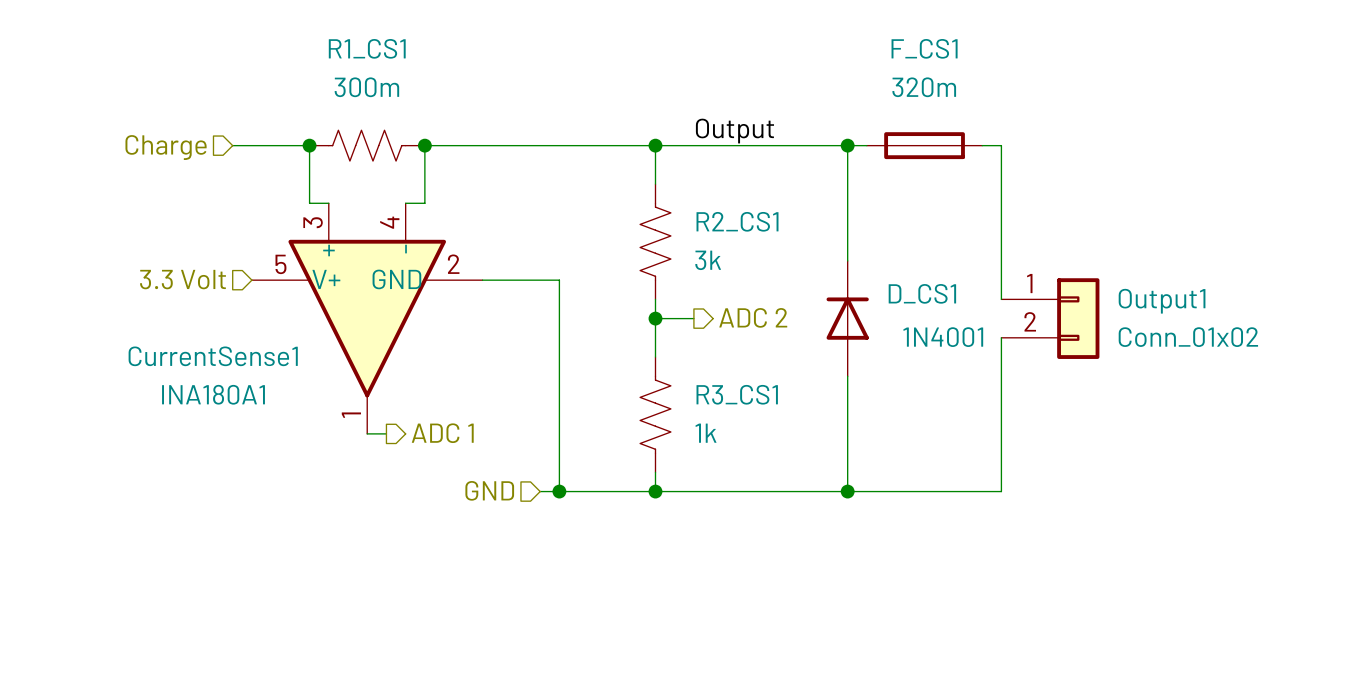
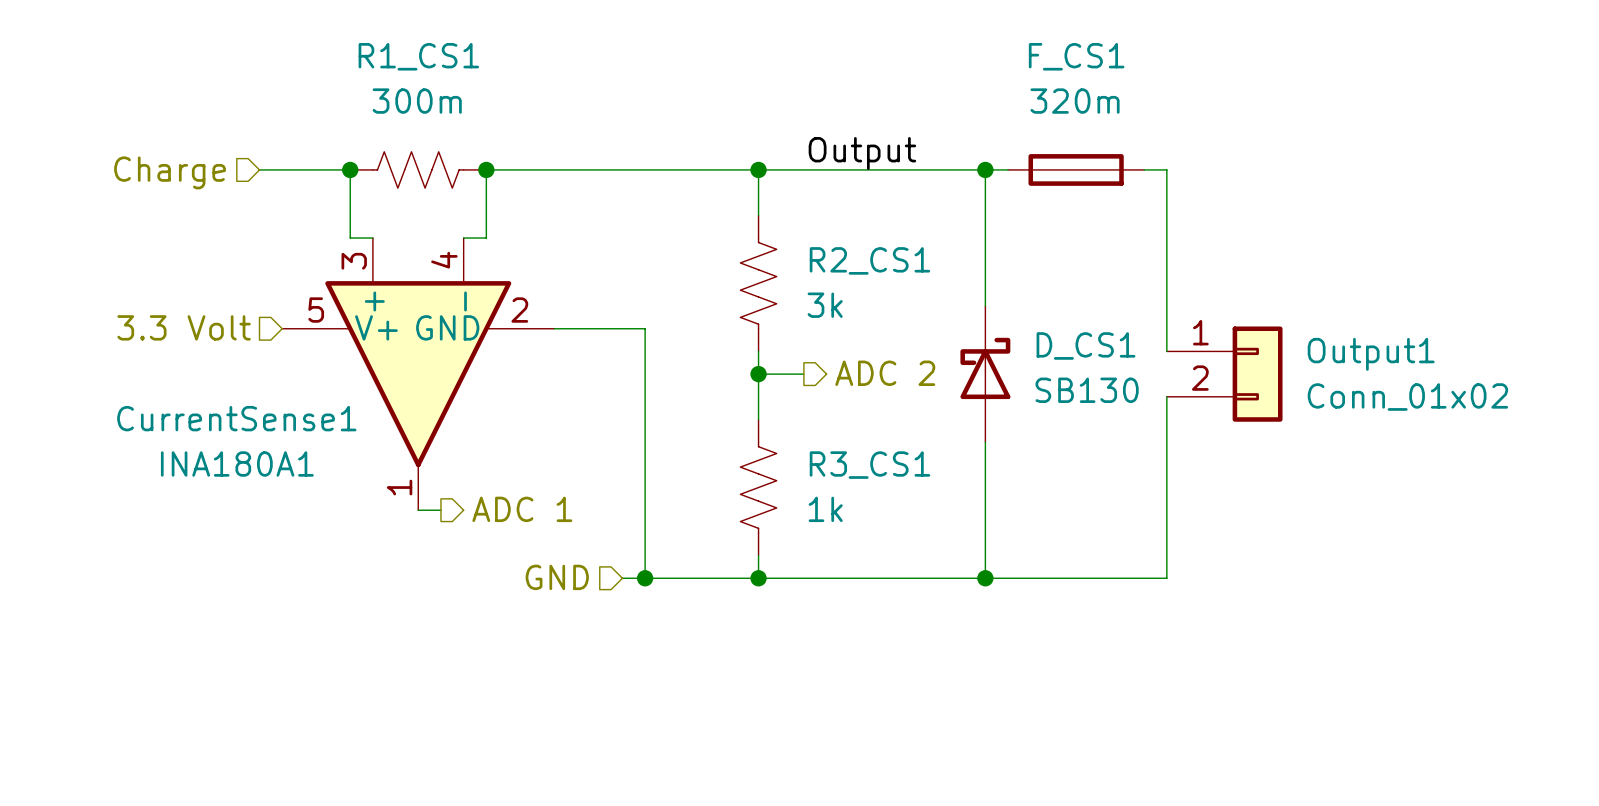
D_CS1 symbol: [826, 260, 869, 377] -> [960, 306, 1011, 443]
D_CS1 value: 1N4001 (943, 337) -> SB130 (1087, 390)

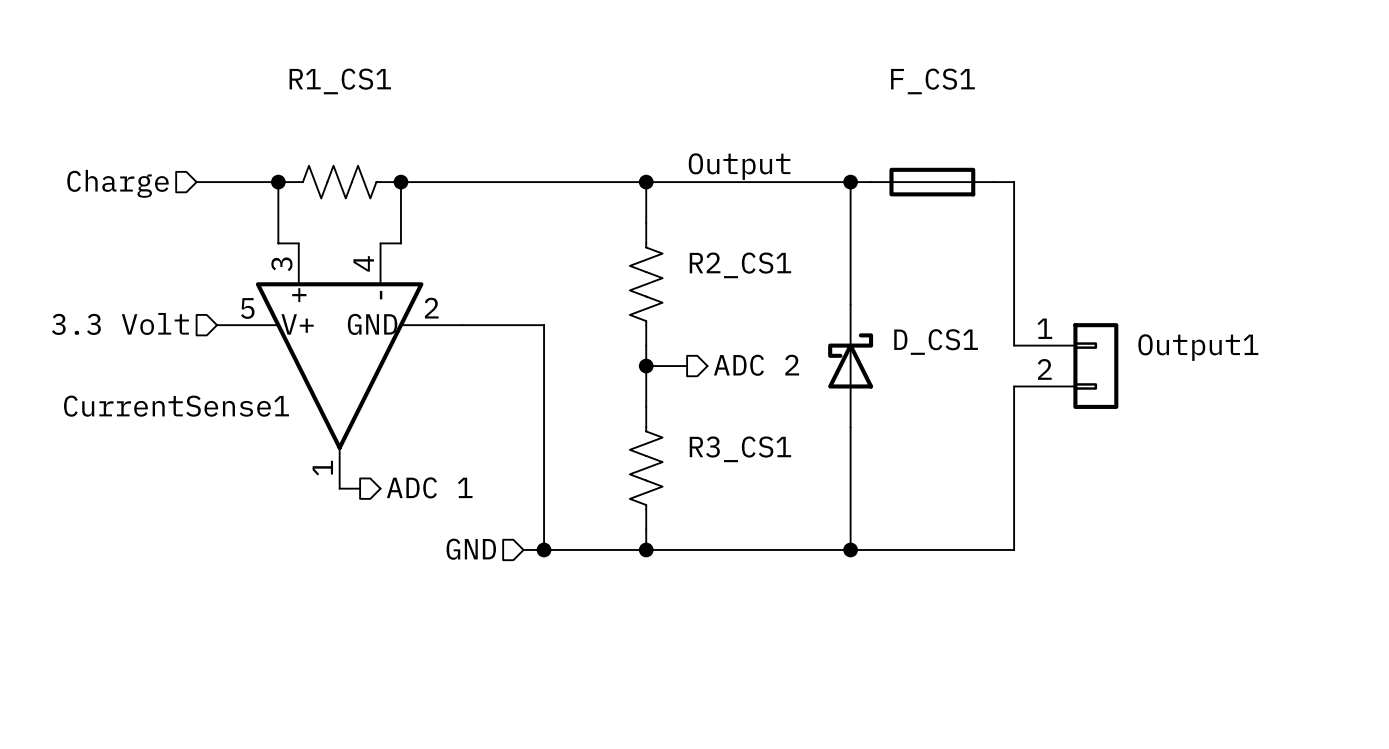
R1_CS1 value: 300m (417, 101) -> none
F_CS1 value: 320m (1075, 101) -> none
R2_CS1 value: 3k (825, 305) -> none
D_CS1 value: SB130 (1087, 390) -> none
Output1 value: Conn_01x02 (1407, 397) -> none
CurrentSense1 value: INA180A1 (237, 464) -> none
R3_CS1 value: 1k (825, 509) -> none

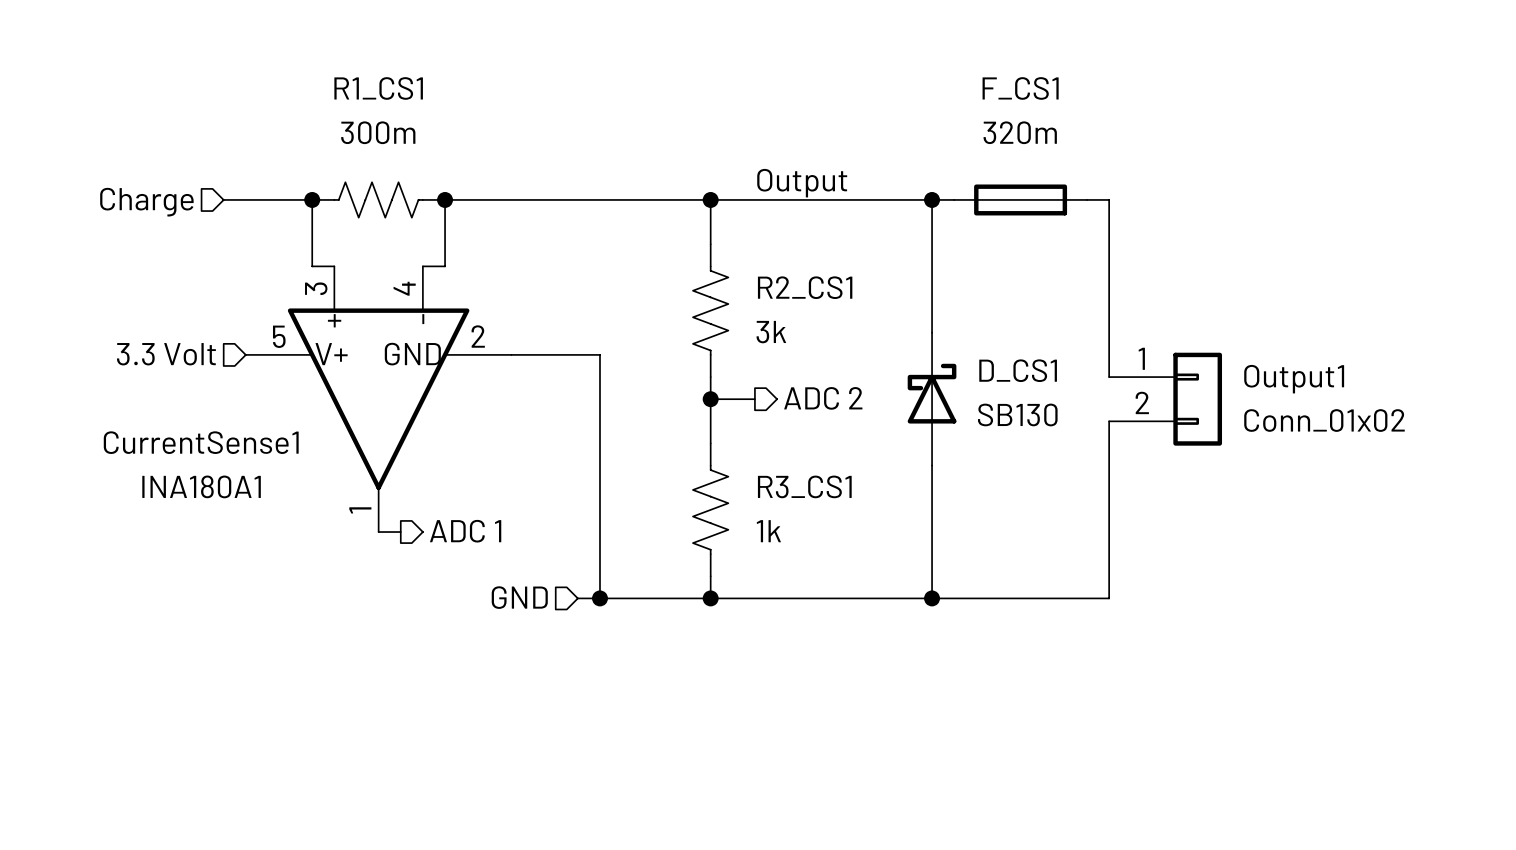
R1_CS1 value: none -> 300m (378, 132)
F_CS1 value: none -> 320m (1020, 132)
R2_CS1 value: none -> 3k (771, 332)
D_CS1 value: none -> SB130 (1017, 414)
Output1 value: none -> Conn_01x02 (1324, 420)
CurrentSense1 value: none -> INA180A1 (201, 486)
R3_CS1 value: none -> 1k (768, 531)

